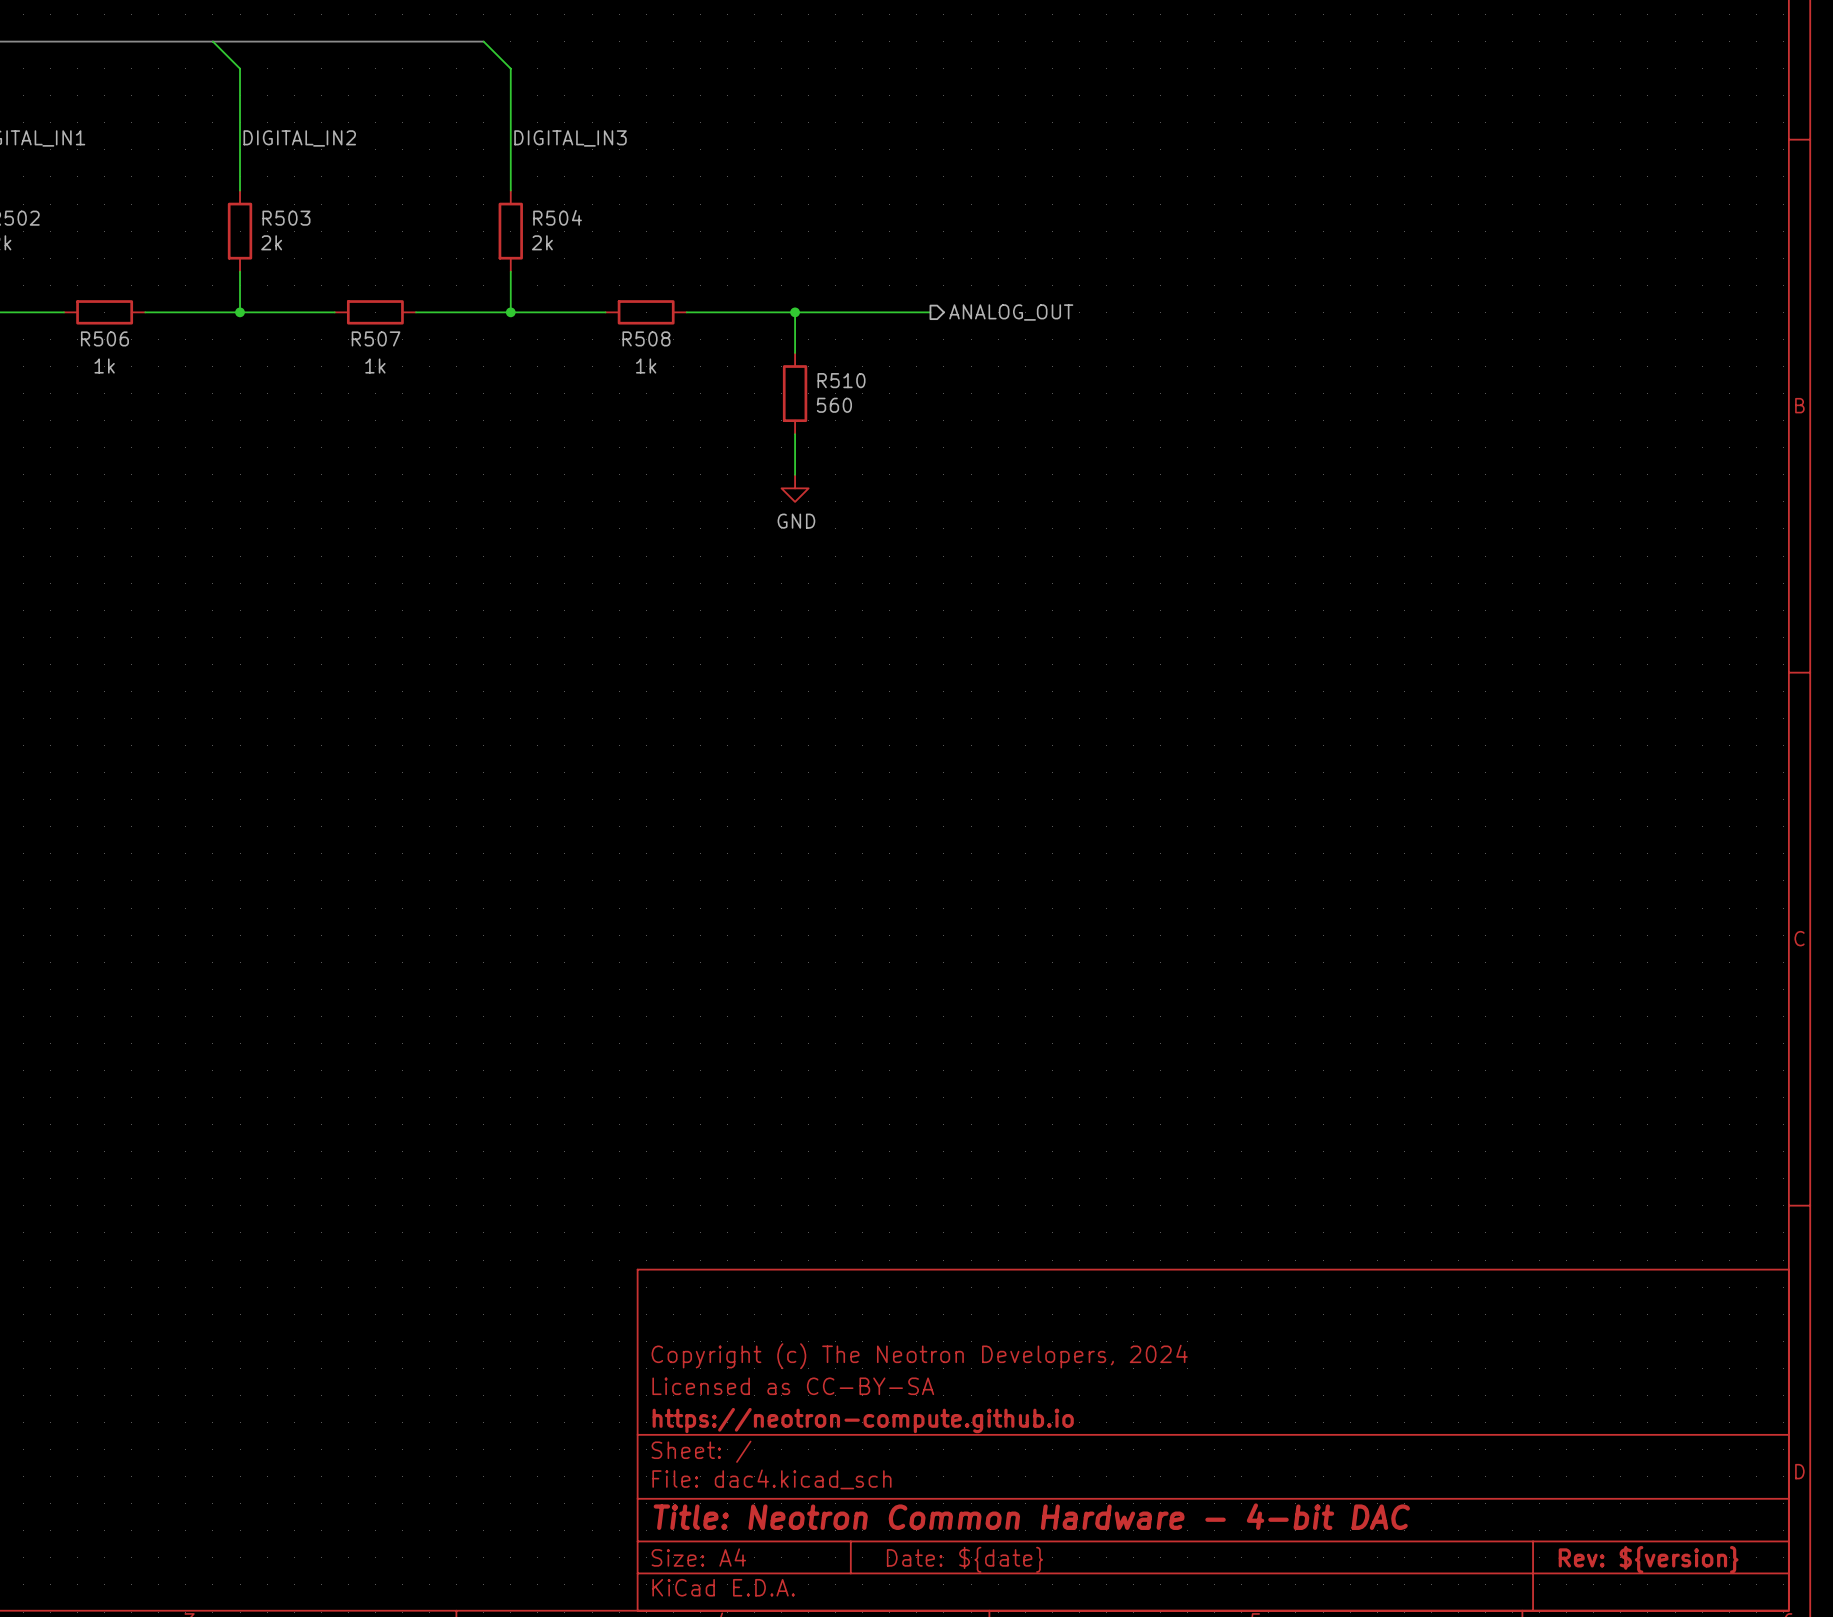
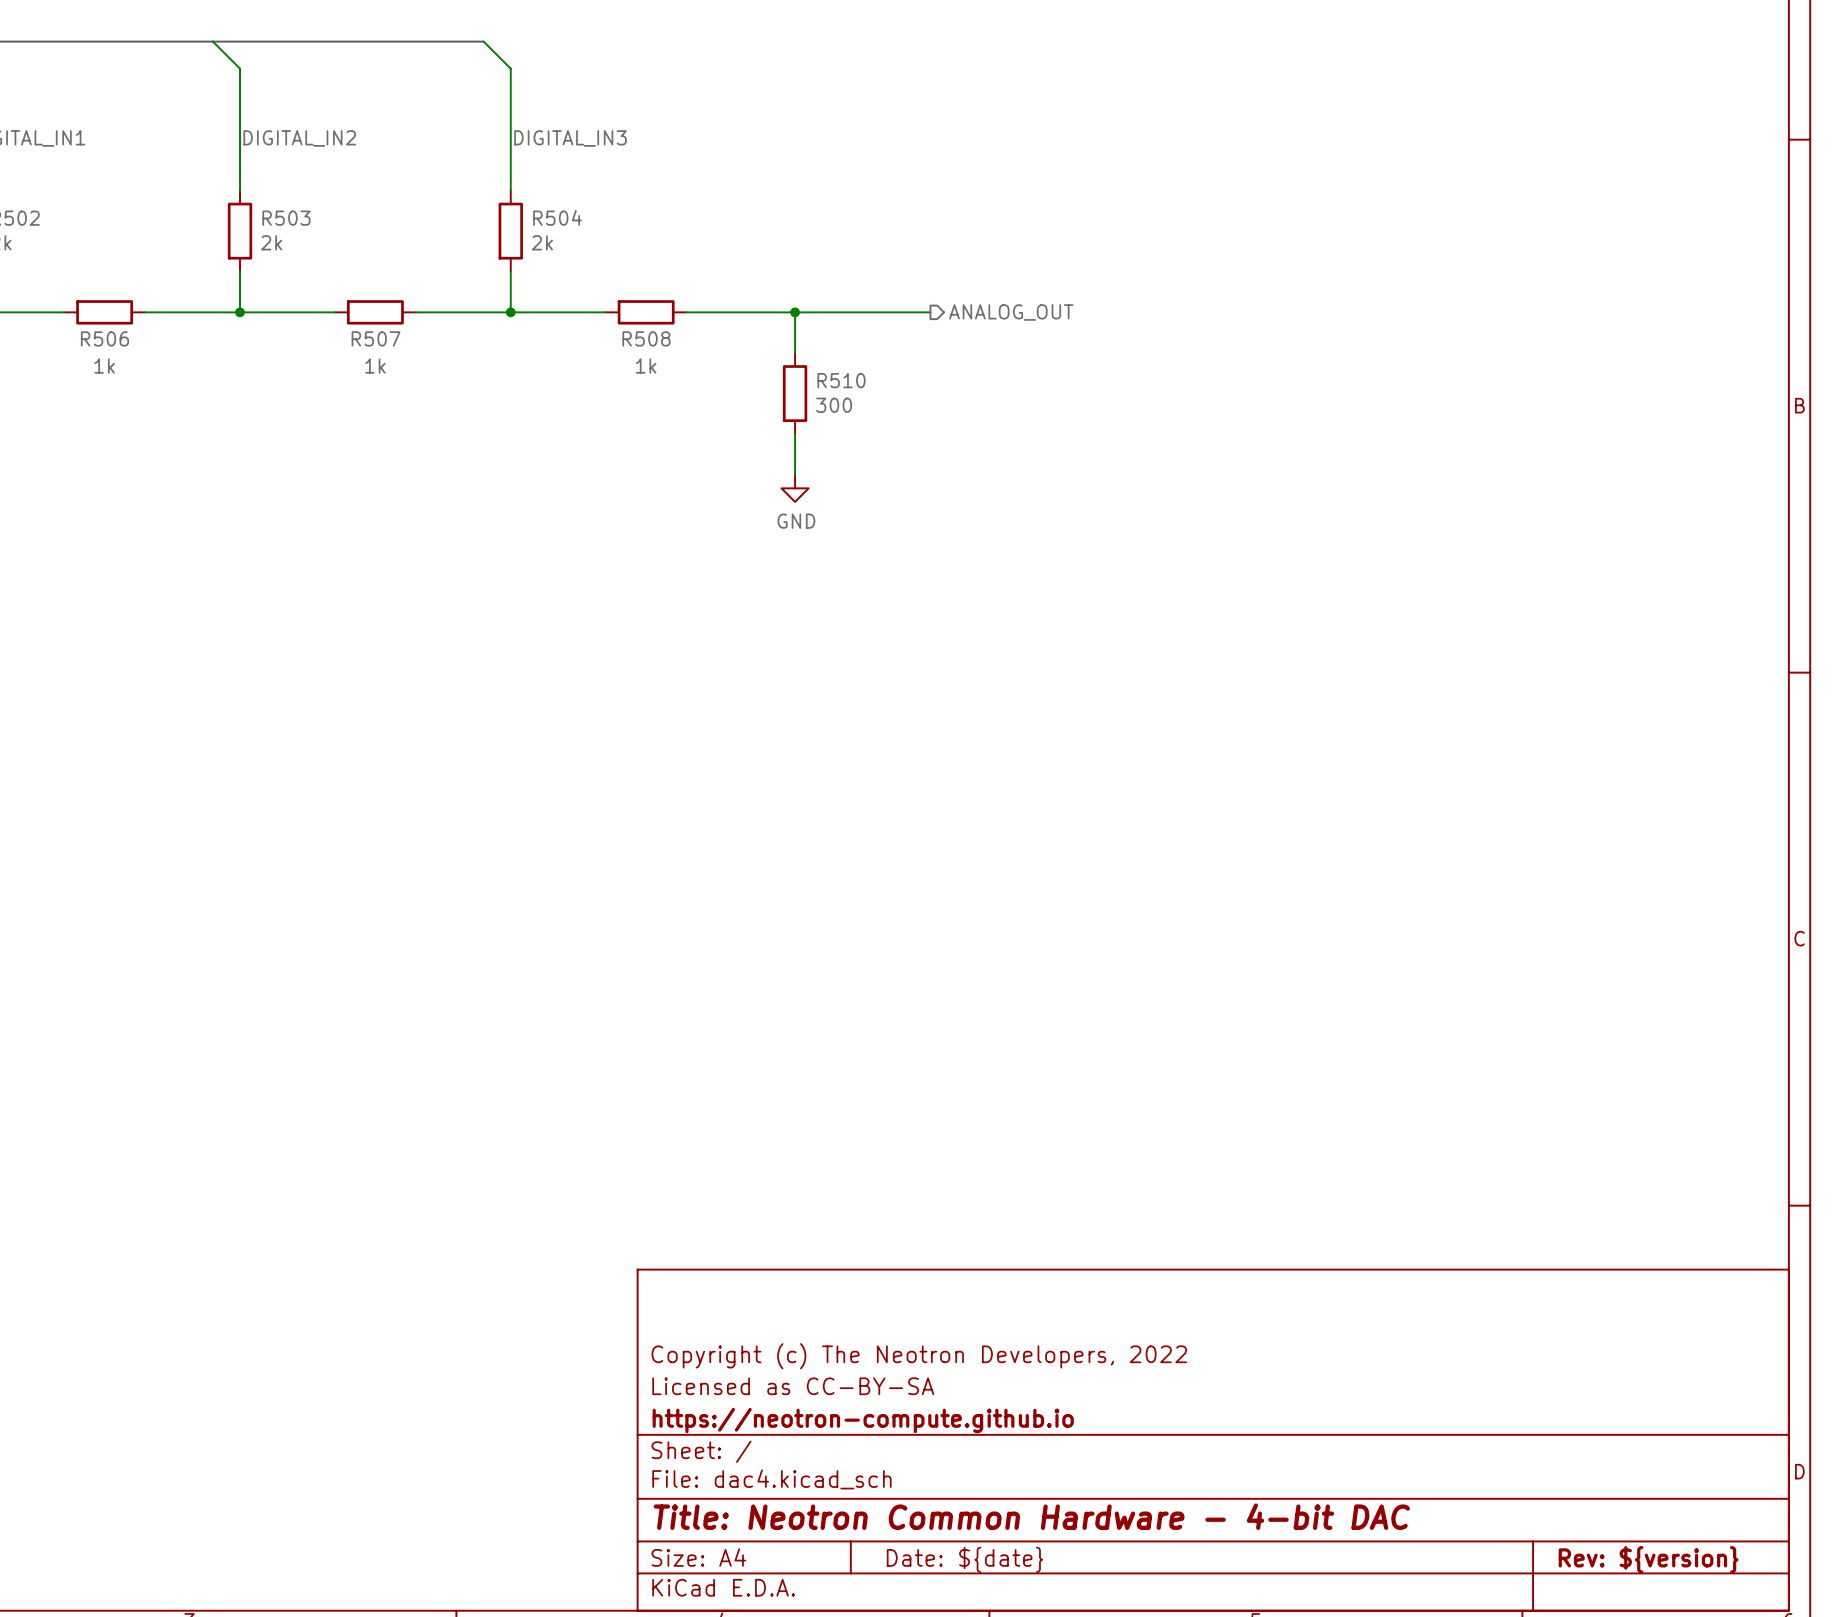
R510 value: 560 (834, 405) -> 300 (834, 405)
title block: Copyright (c) The Neotron Developers, 2024 (919, 1356) -> Copyright (c) The Neotron Developers, 2022 (919, 1356)

